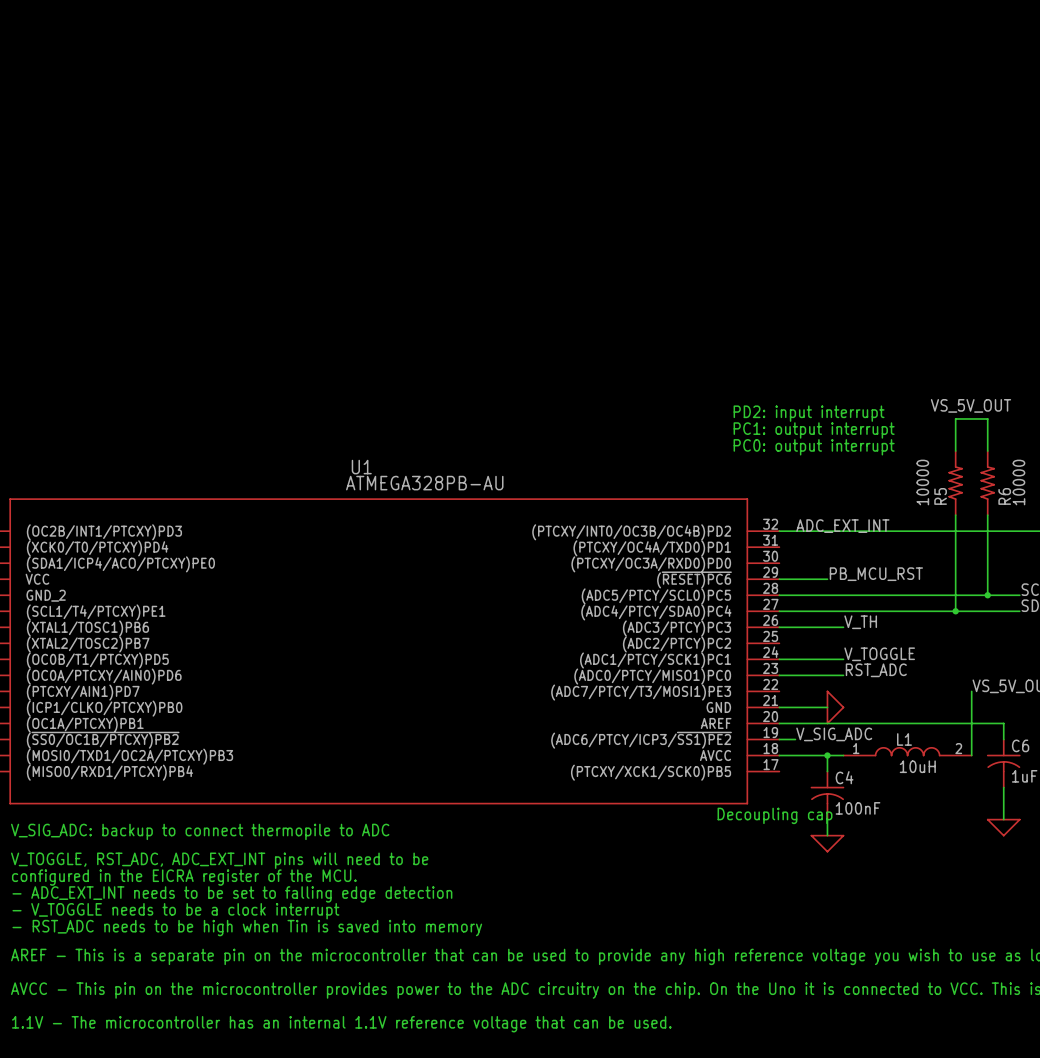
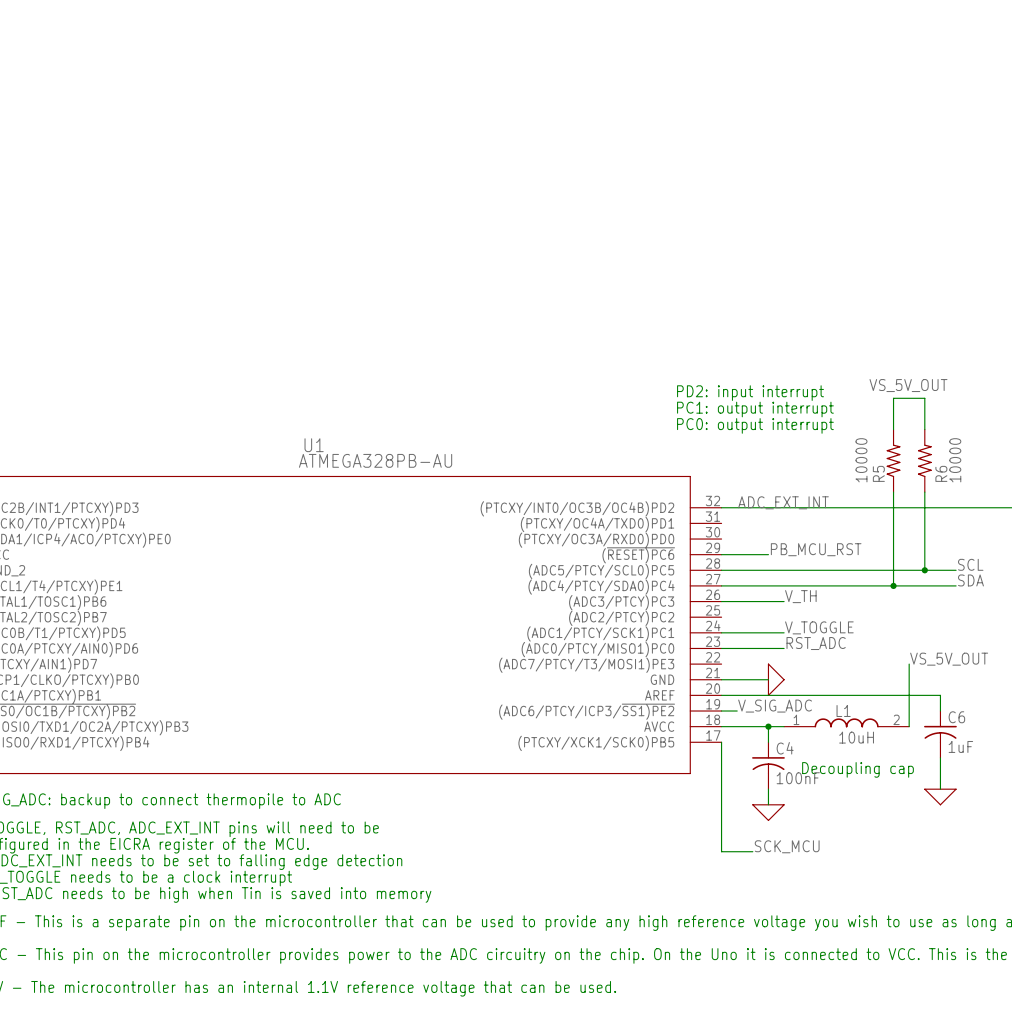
wire: none -> (721, 742) (721, 851) (752, 851)
text position: Decoupling cap (775, 815) -> Decoupling cap (857, 769)
label: none -> SCK_MCU (787, 846)

